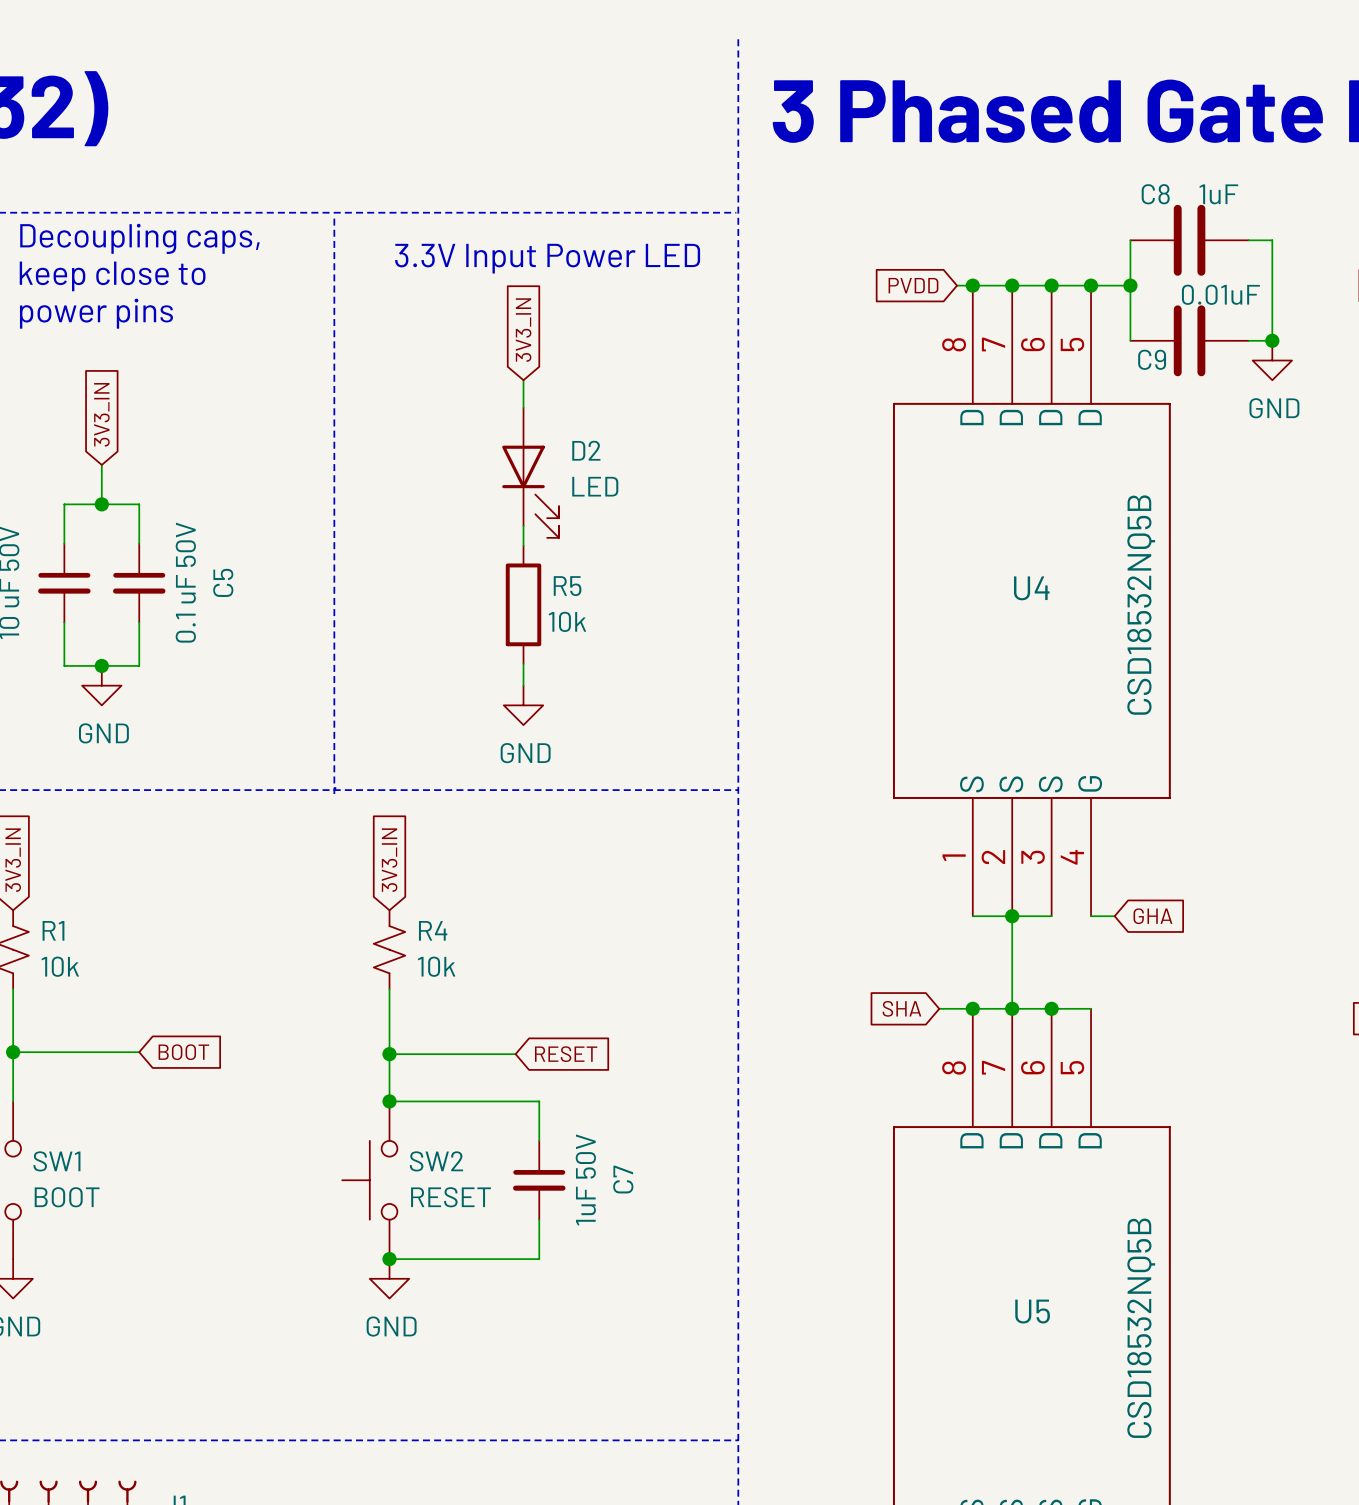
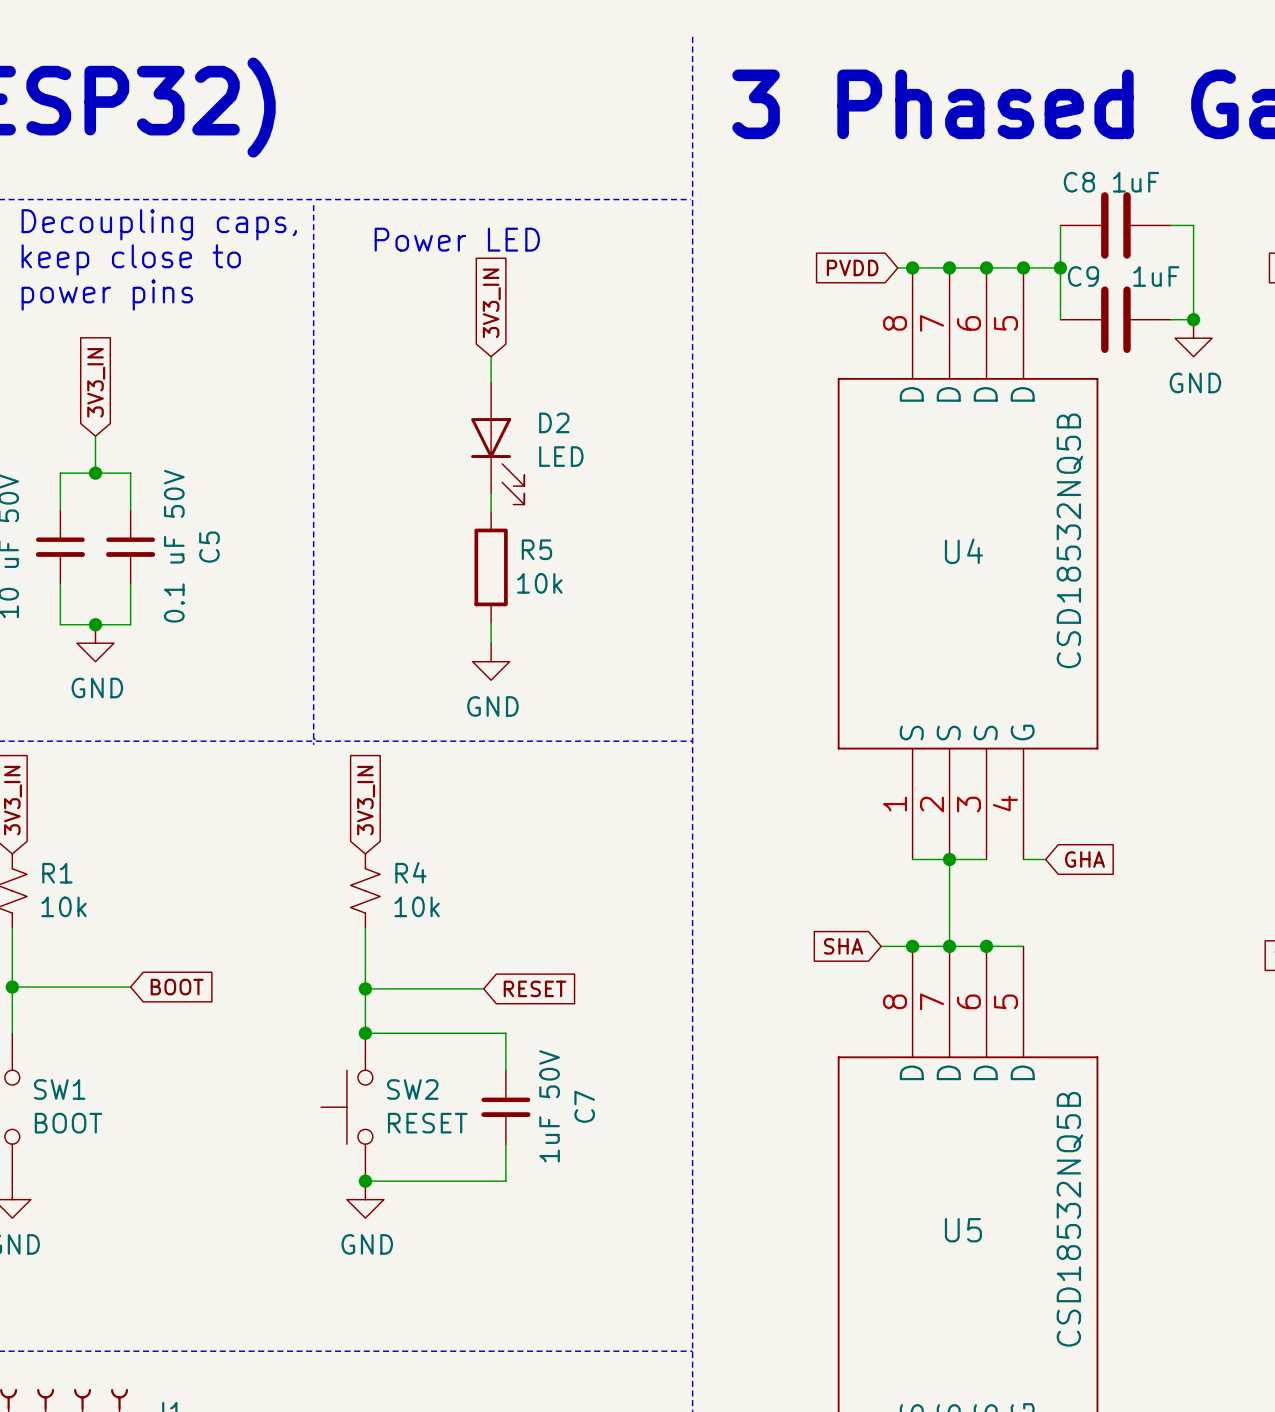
text: 3.3V Input Power LED (547, 258) -> Power LED (457, 239)
C9 value: 0.01uF (1220, 294) -> 1uF (1156, 276)
C9 name position: C9 (1152, 359) -> C9 (1083, 276)

